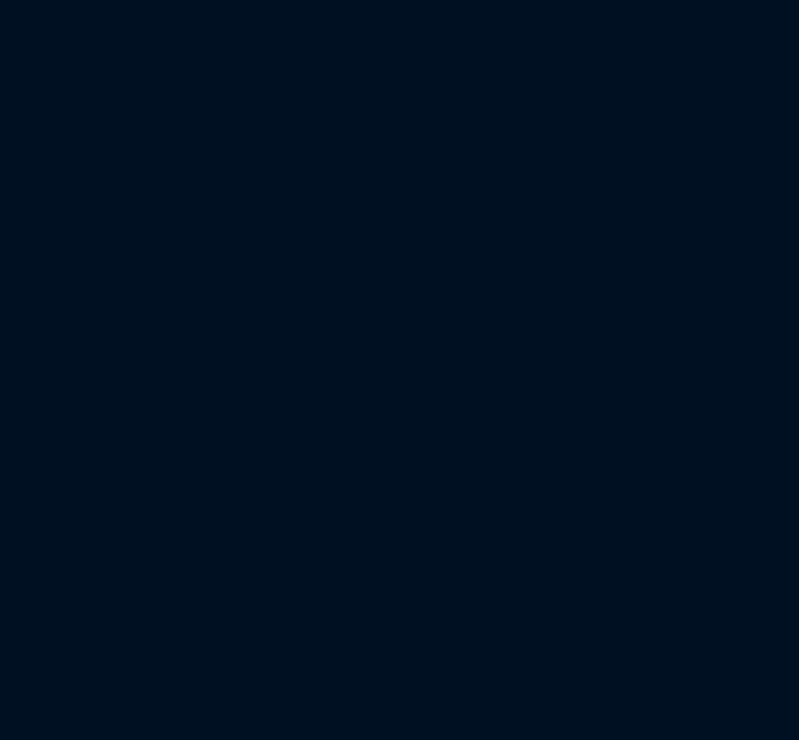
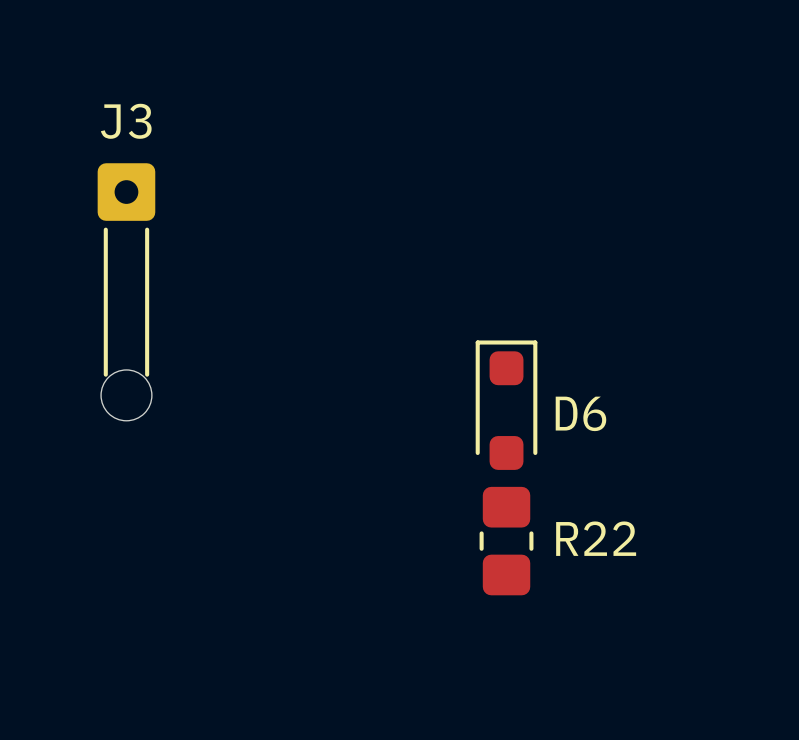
J3: none -> (126, 292)
D6: none -> (506, 405)
R22: none -> (506, 541)

